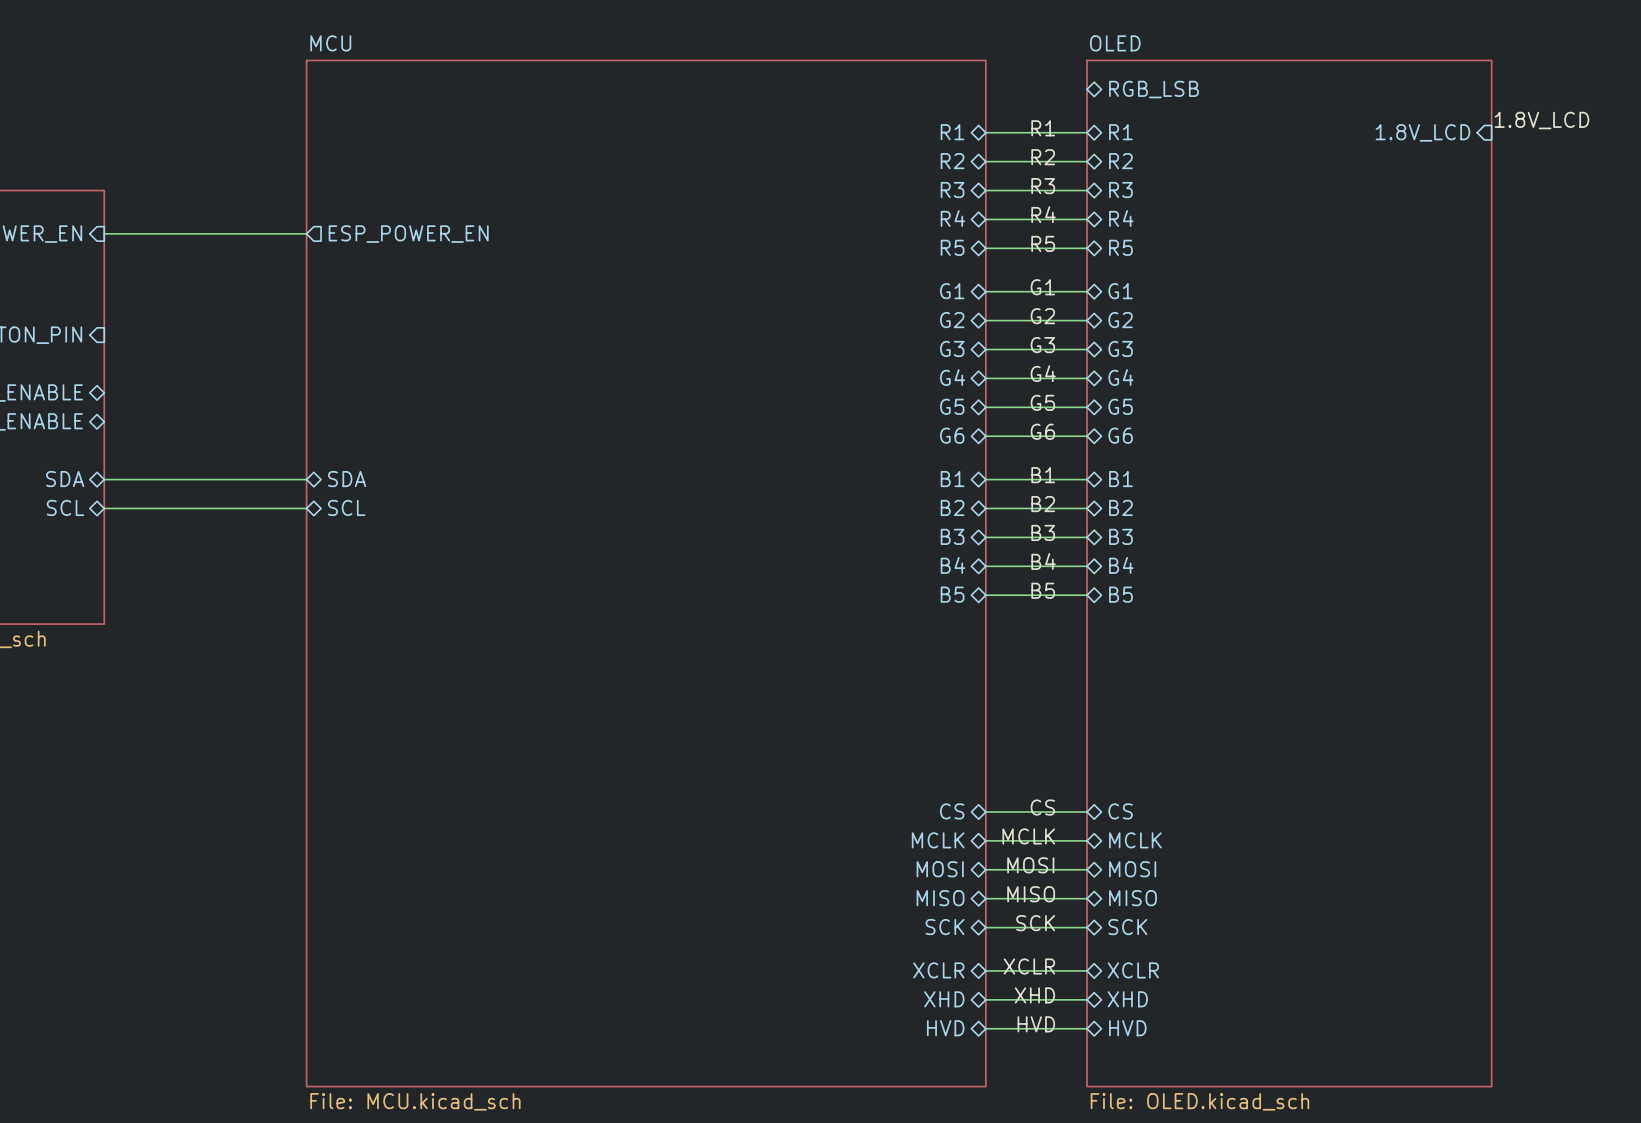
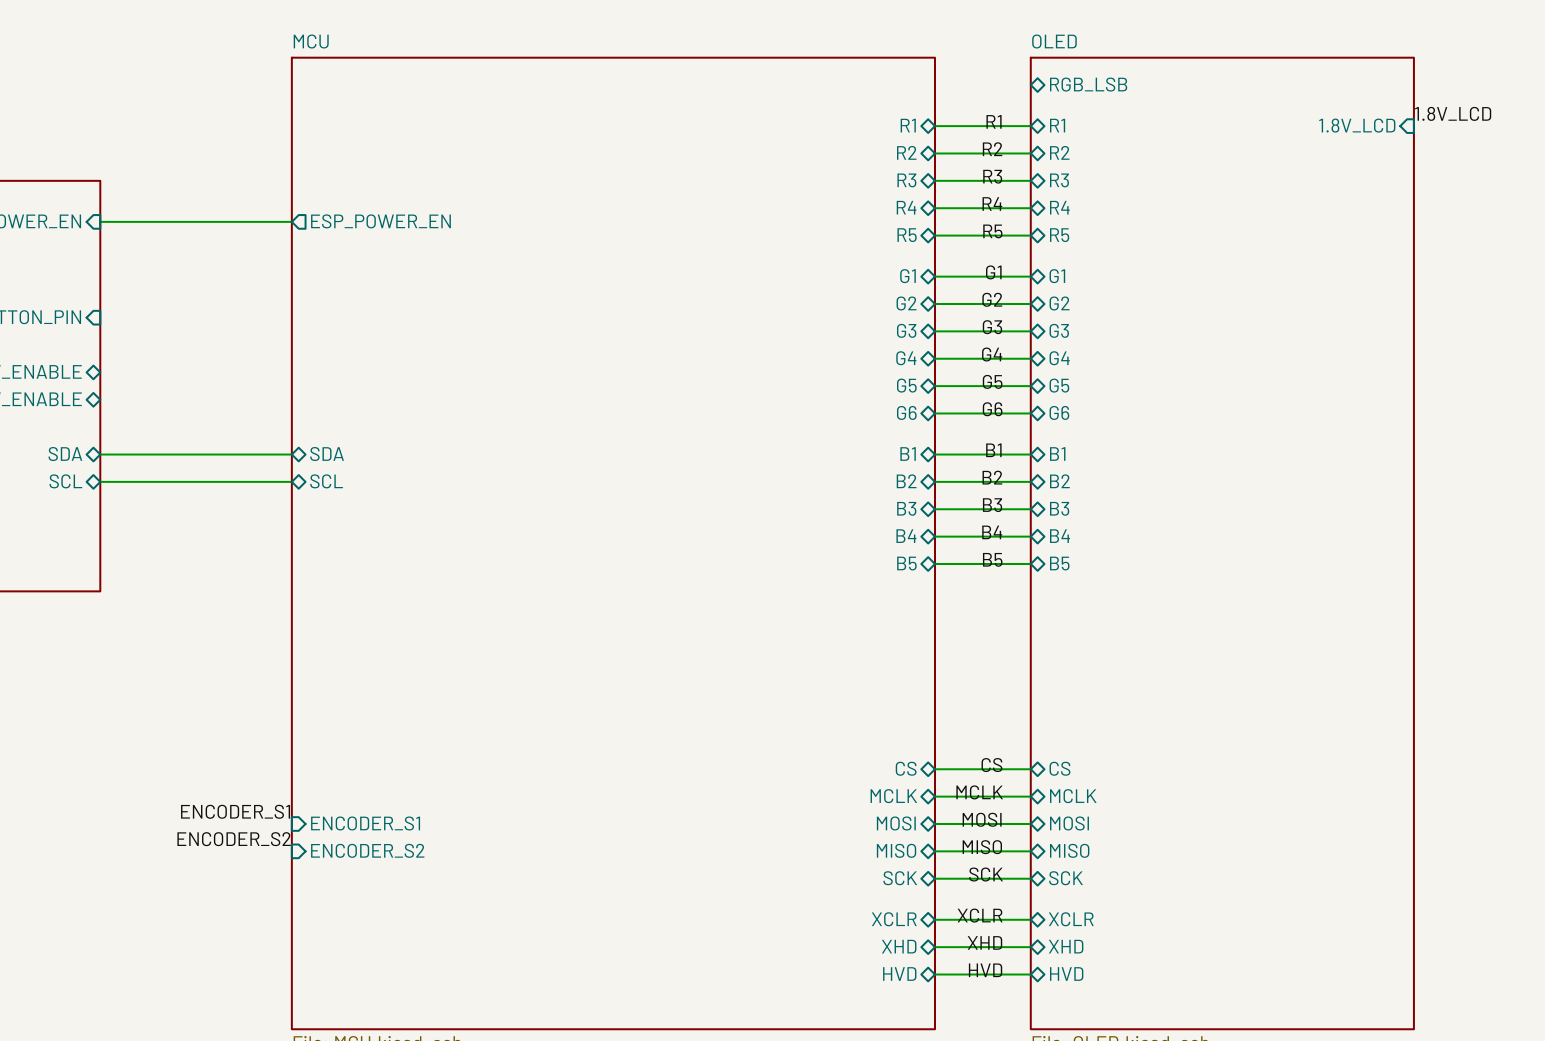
label: none -> ENCODER_S1 (235, 811)
sheet pin: none -> ENCODER_S1 (365, 823)
label: none -> ENCODER_S2 (234, 839)
sheet pin: none -> ENCODER_S2 (367, 850)

